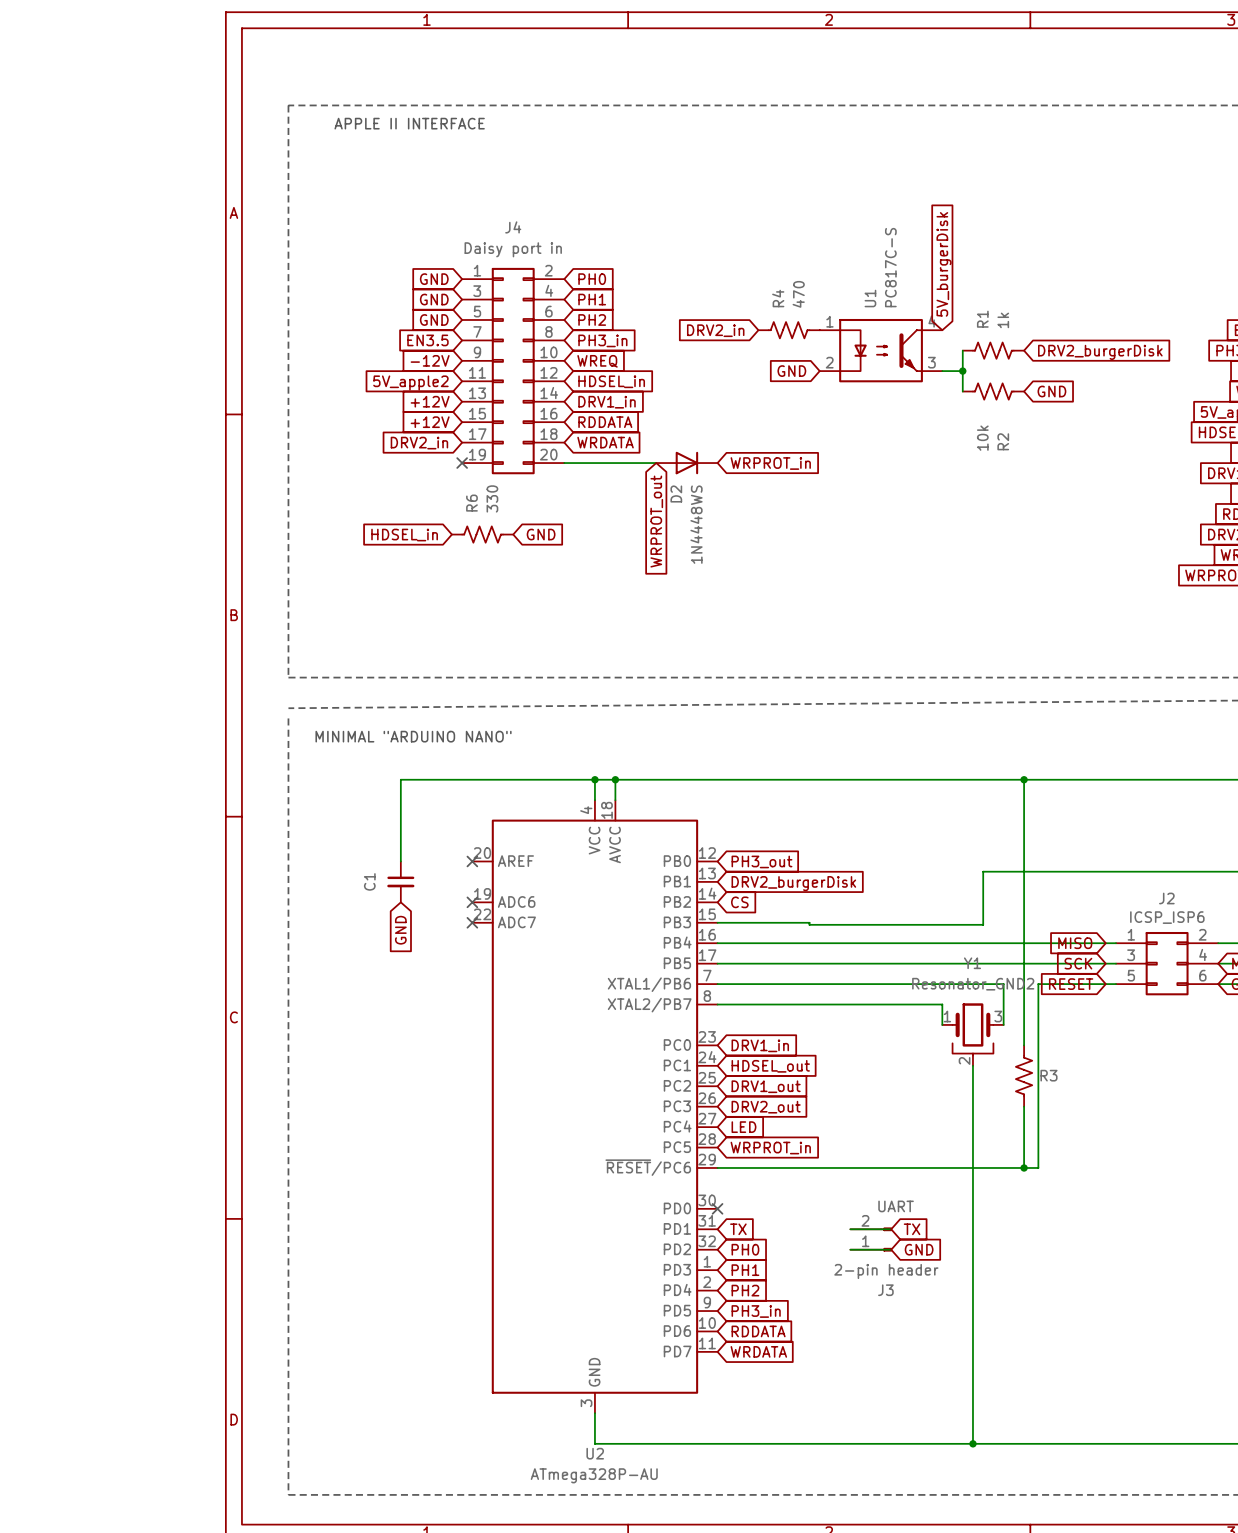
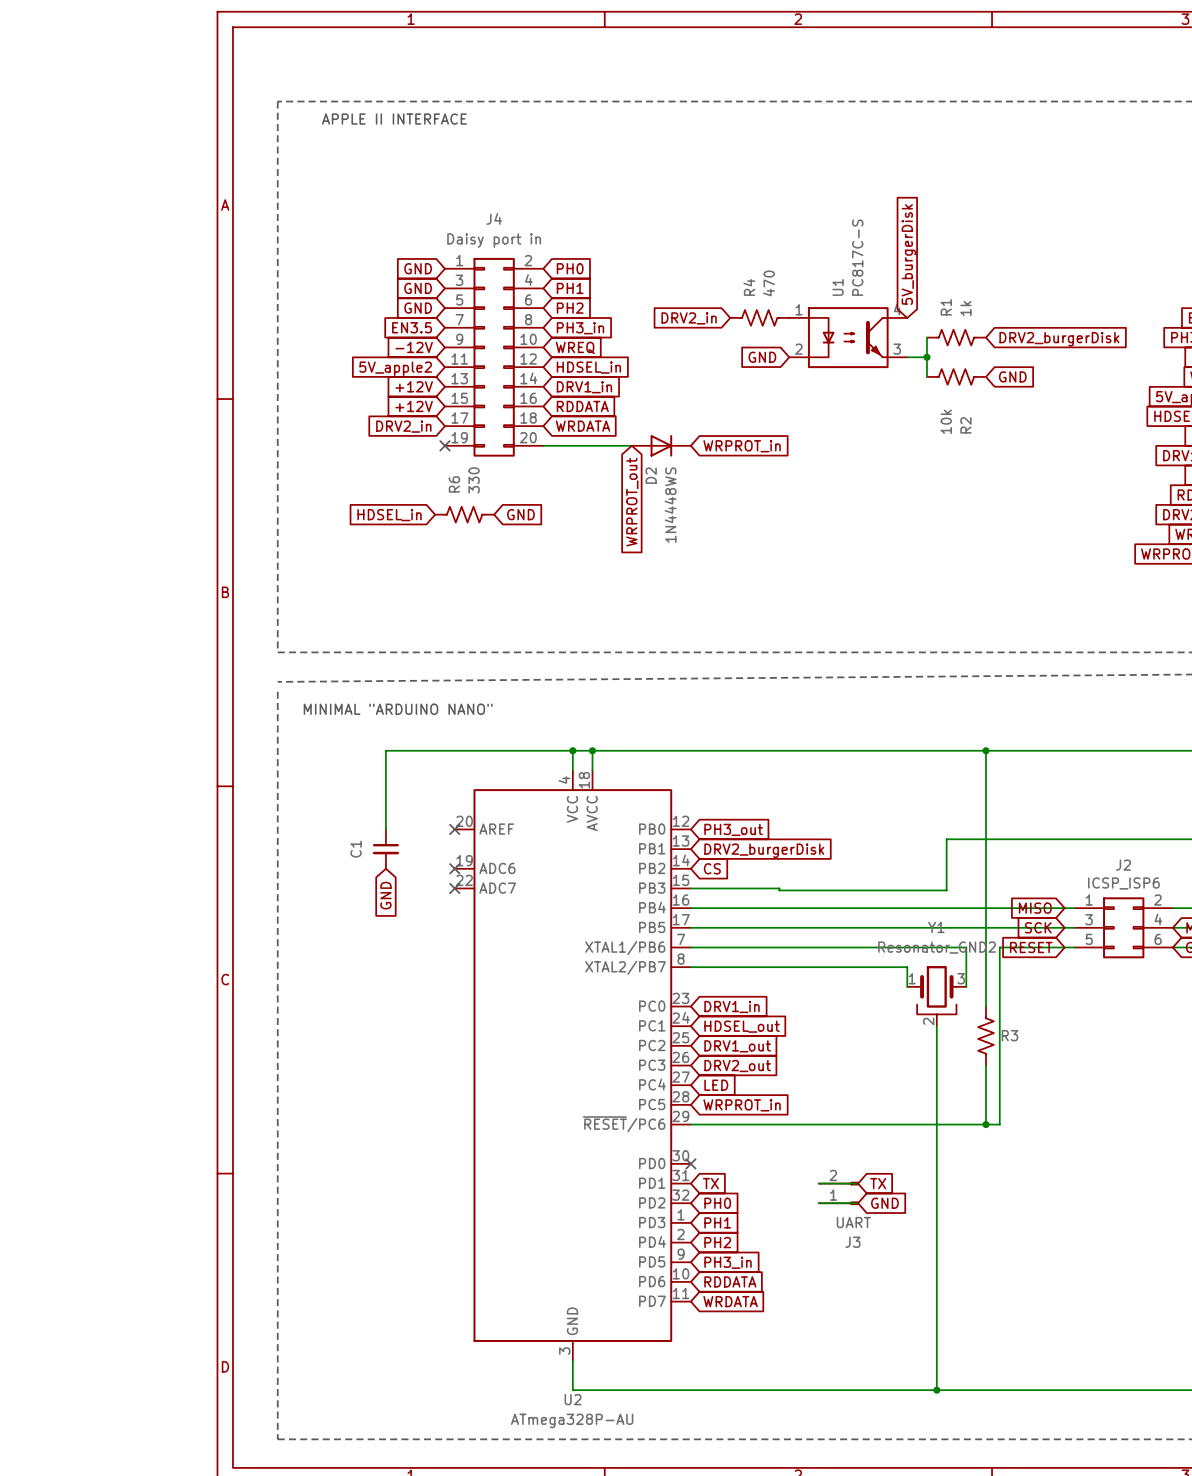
J3 text: UART (896, 1206) -> none
J3 value: 2-pin header (886, 1271) -> UART (853, 1222)

